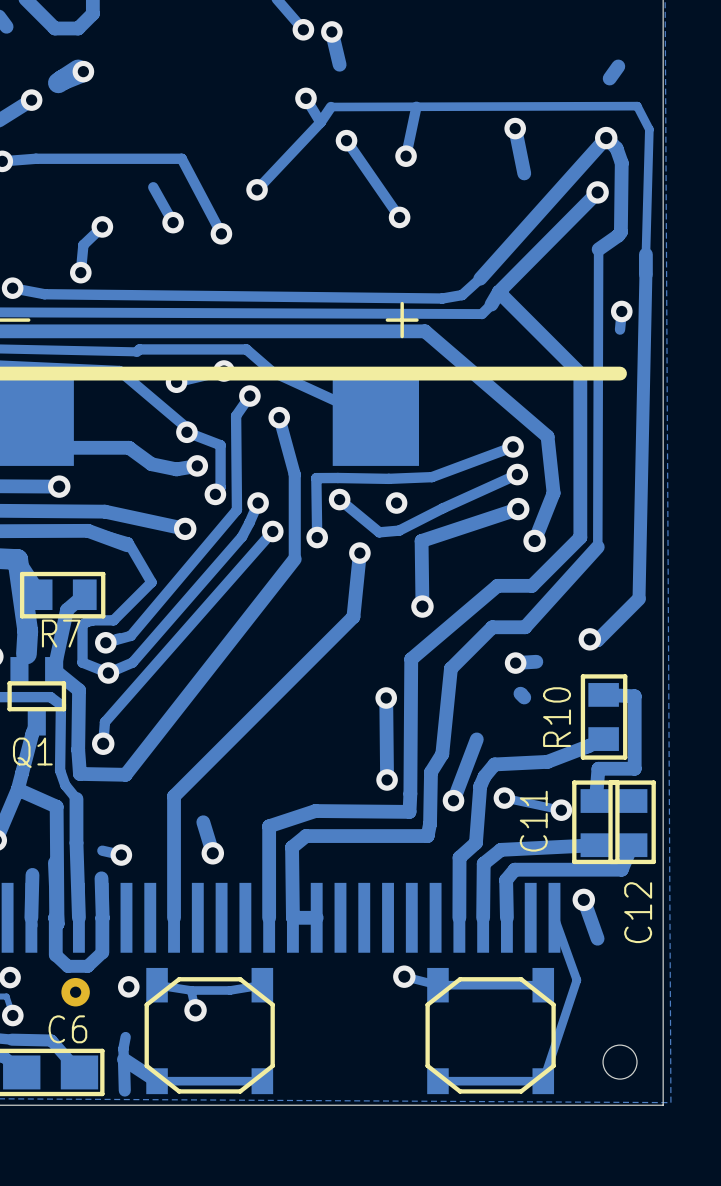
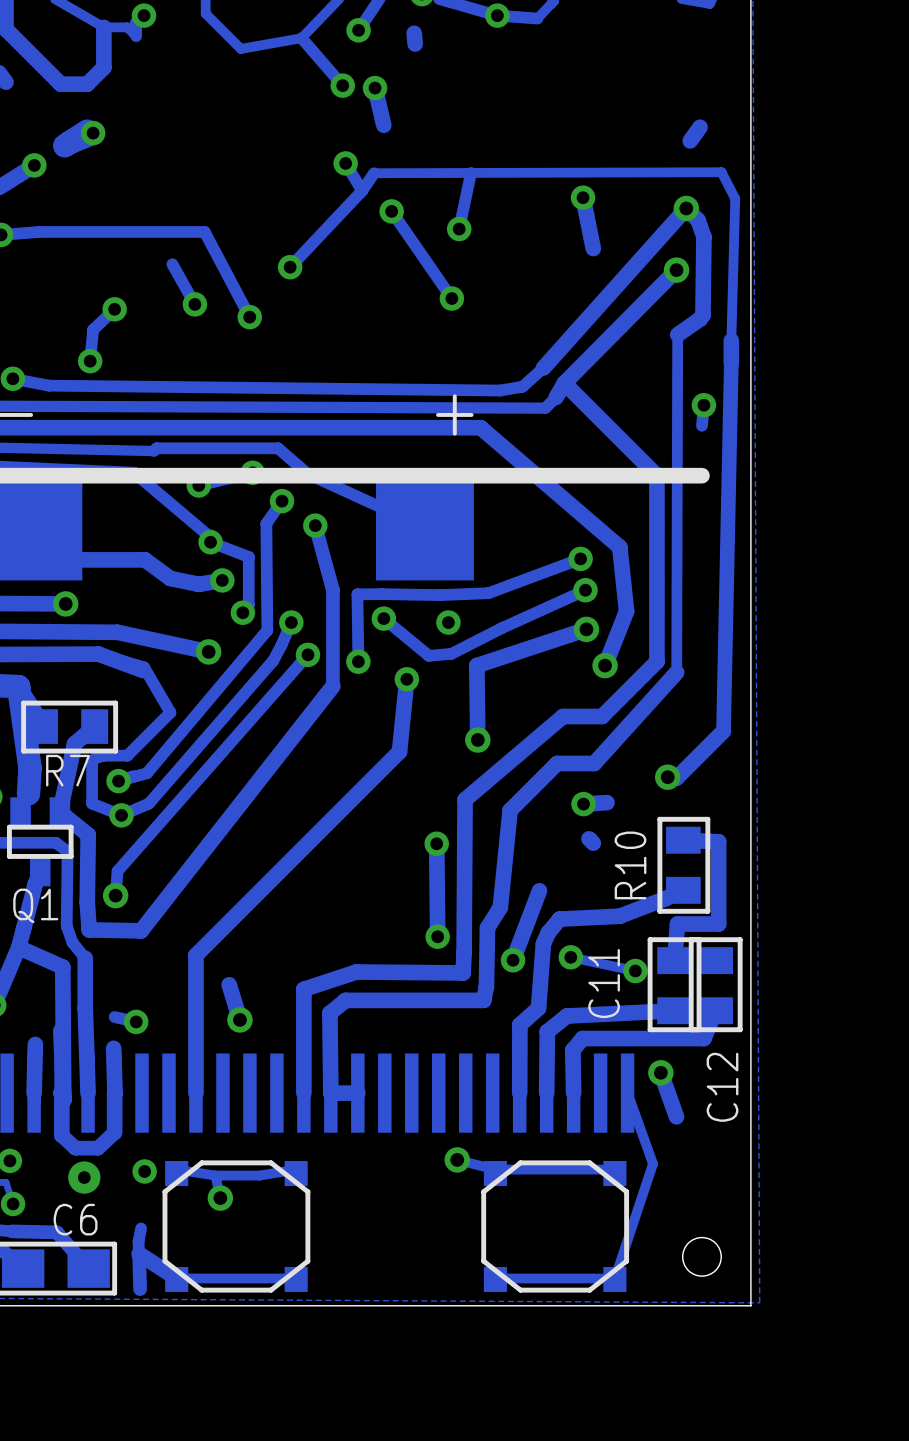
part footprint: [144, 967, 275, 1095] -> [162, 1160, 311, 1293]
part footprint: [425, 967, 556, 1095] -> [481, 1160, 630, 1293]

